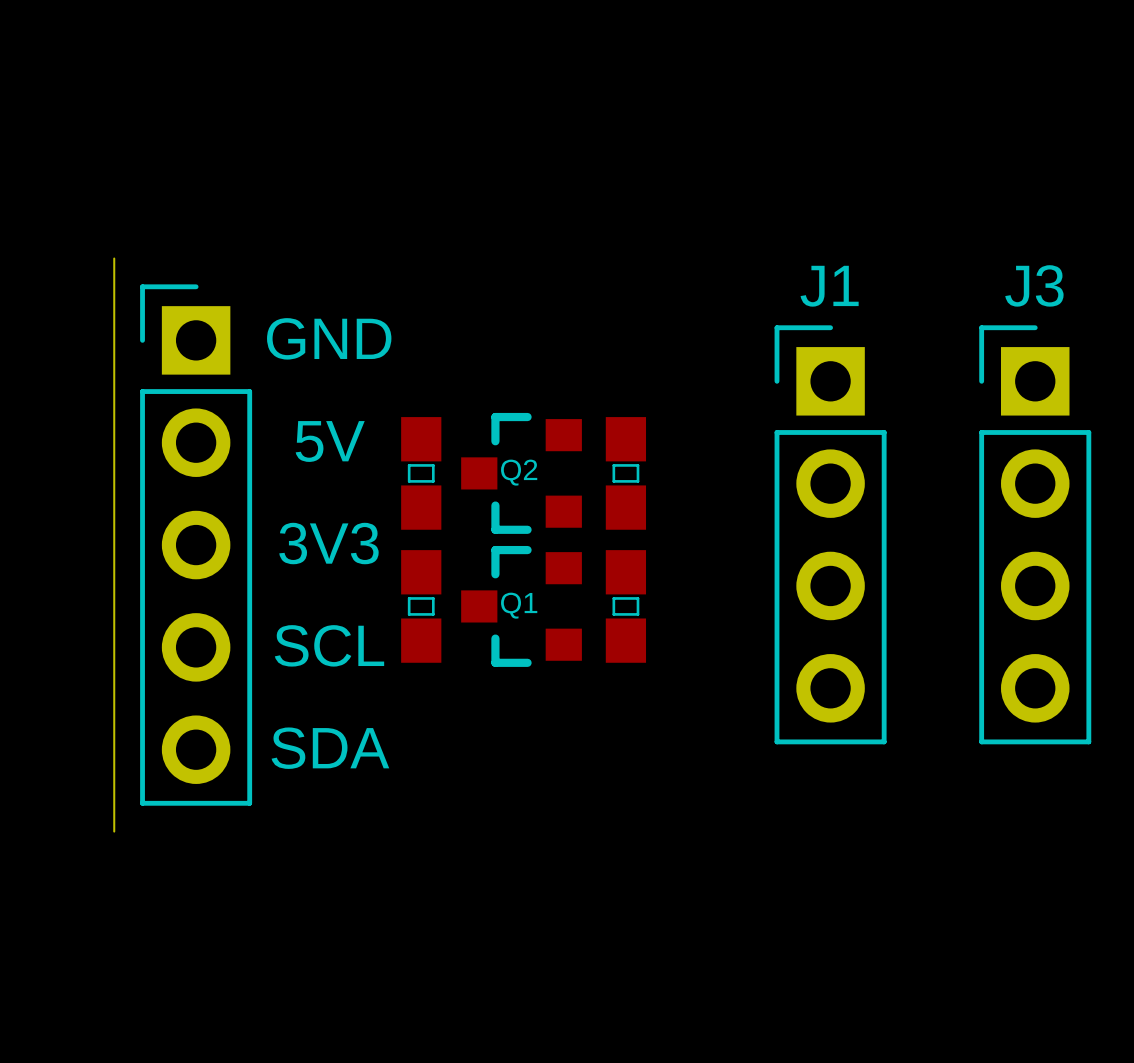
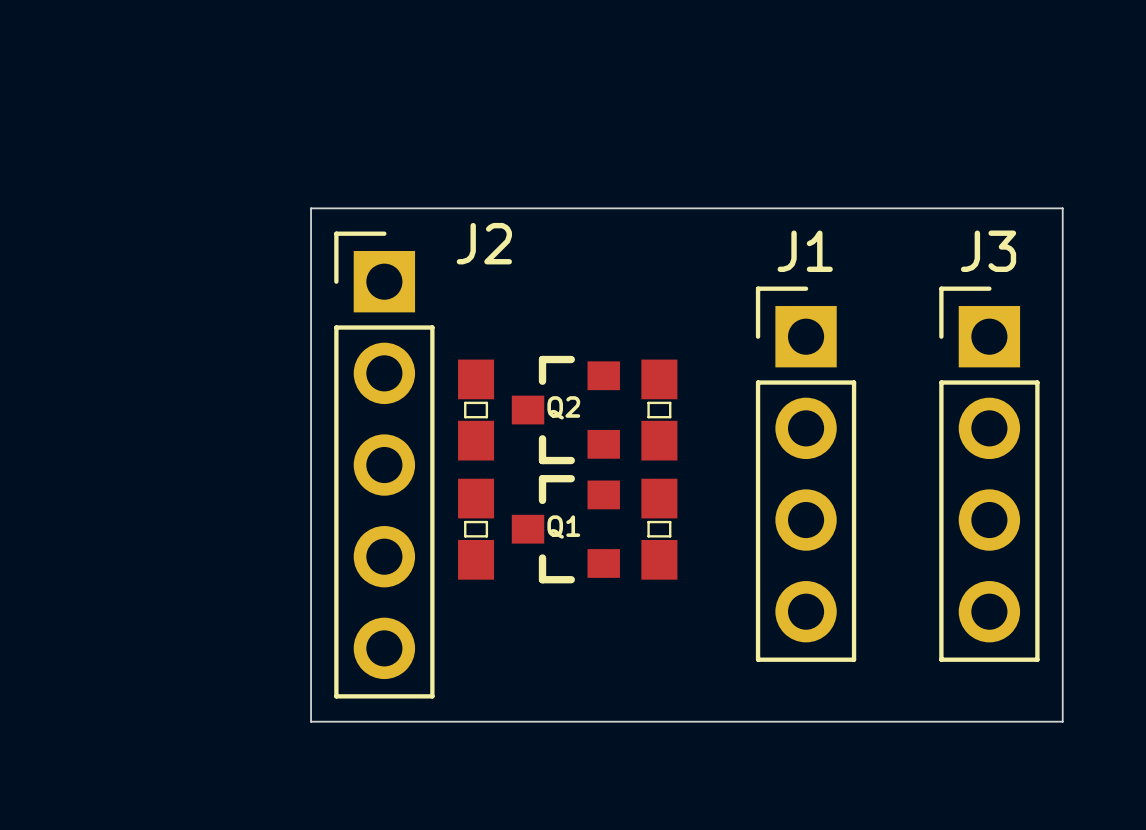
board edge: none -> (311, 208) (1062, 208) (1062, 721) (311, 721) (311, 208)
board edge: (114, 258) (114, 831) -> none
text: GND (329, 338) -> none
text: 5V (330, 441) -> none
J2: none -> (384, 465)
J1 position: (830, 534) -> (806, 474)
J3 position: (1035, 534) -> (989, 474)
text: 3V3 (328, 543) -> none
part: (196, 545) -> none
text: SCL (329, 645) -> none
text: SDA (330, 748) -> none

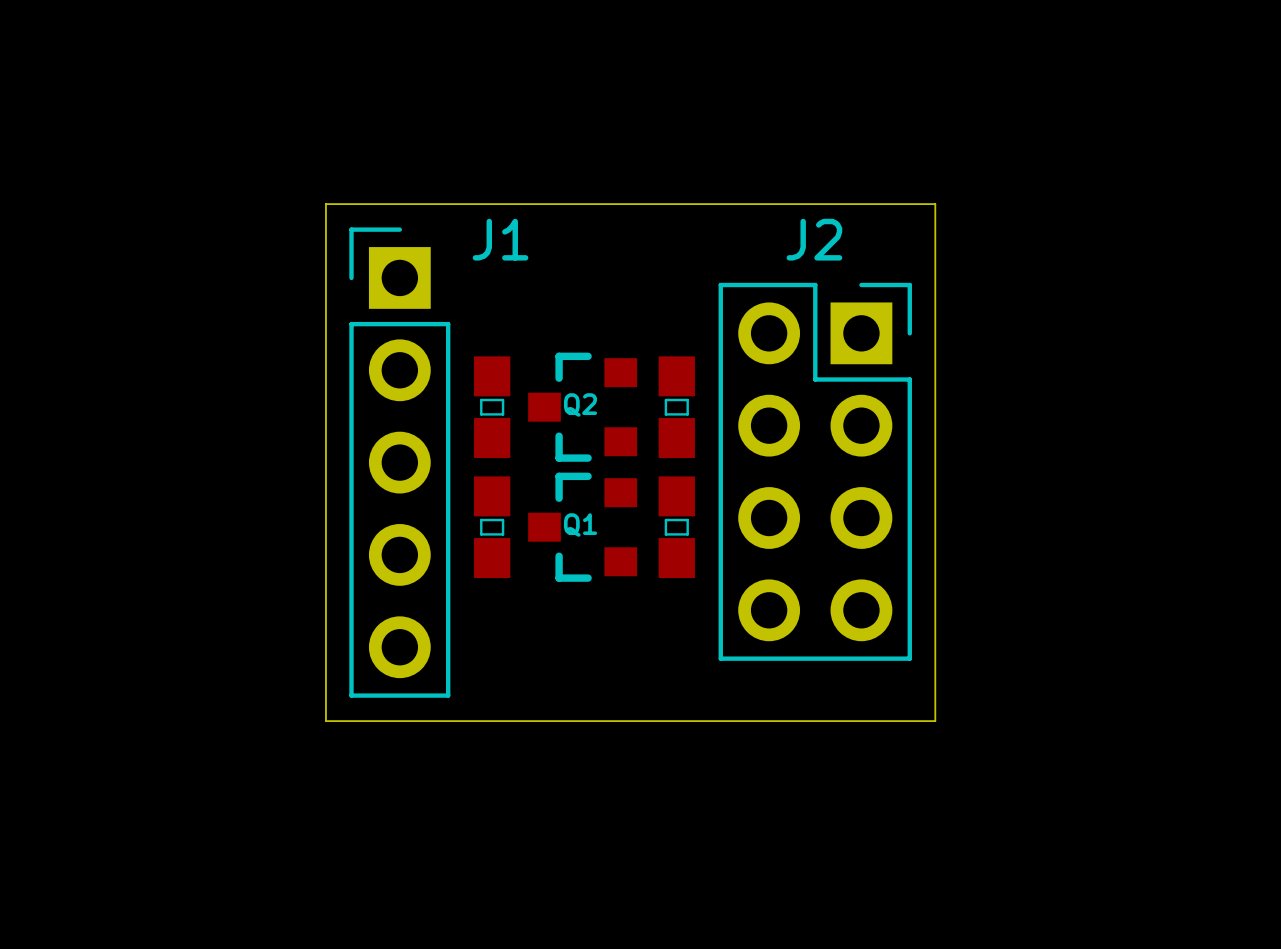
board edge: (916, 208) (1062, 208) (1062, 721) (916, 721) -> (935, 204) (935, 721)
J2 name: J2 (484, 243) -> J1 (500, 239)
J2: none -> (815, 471)
J1: (806, 474) -> none
J3: (989, 474) -> none

